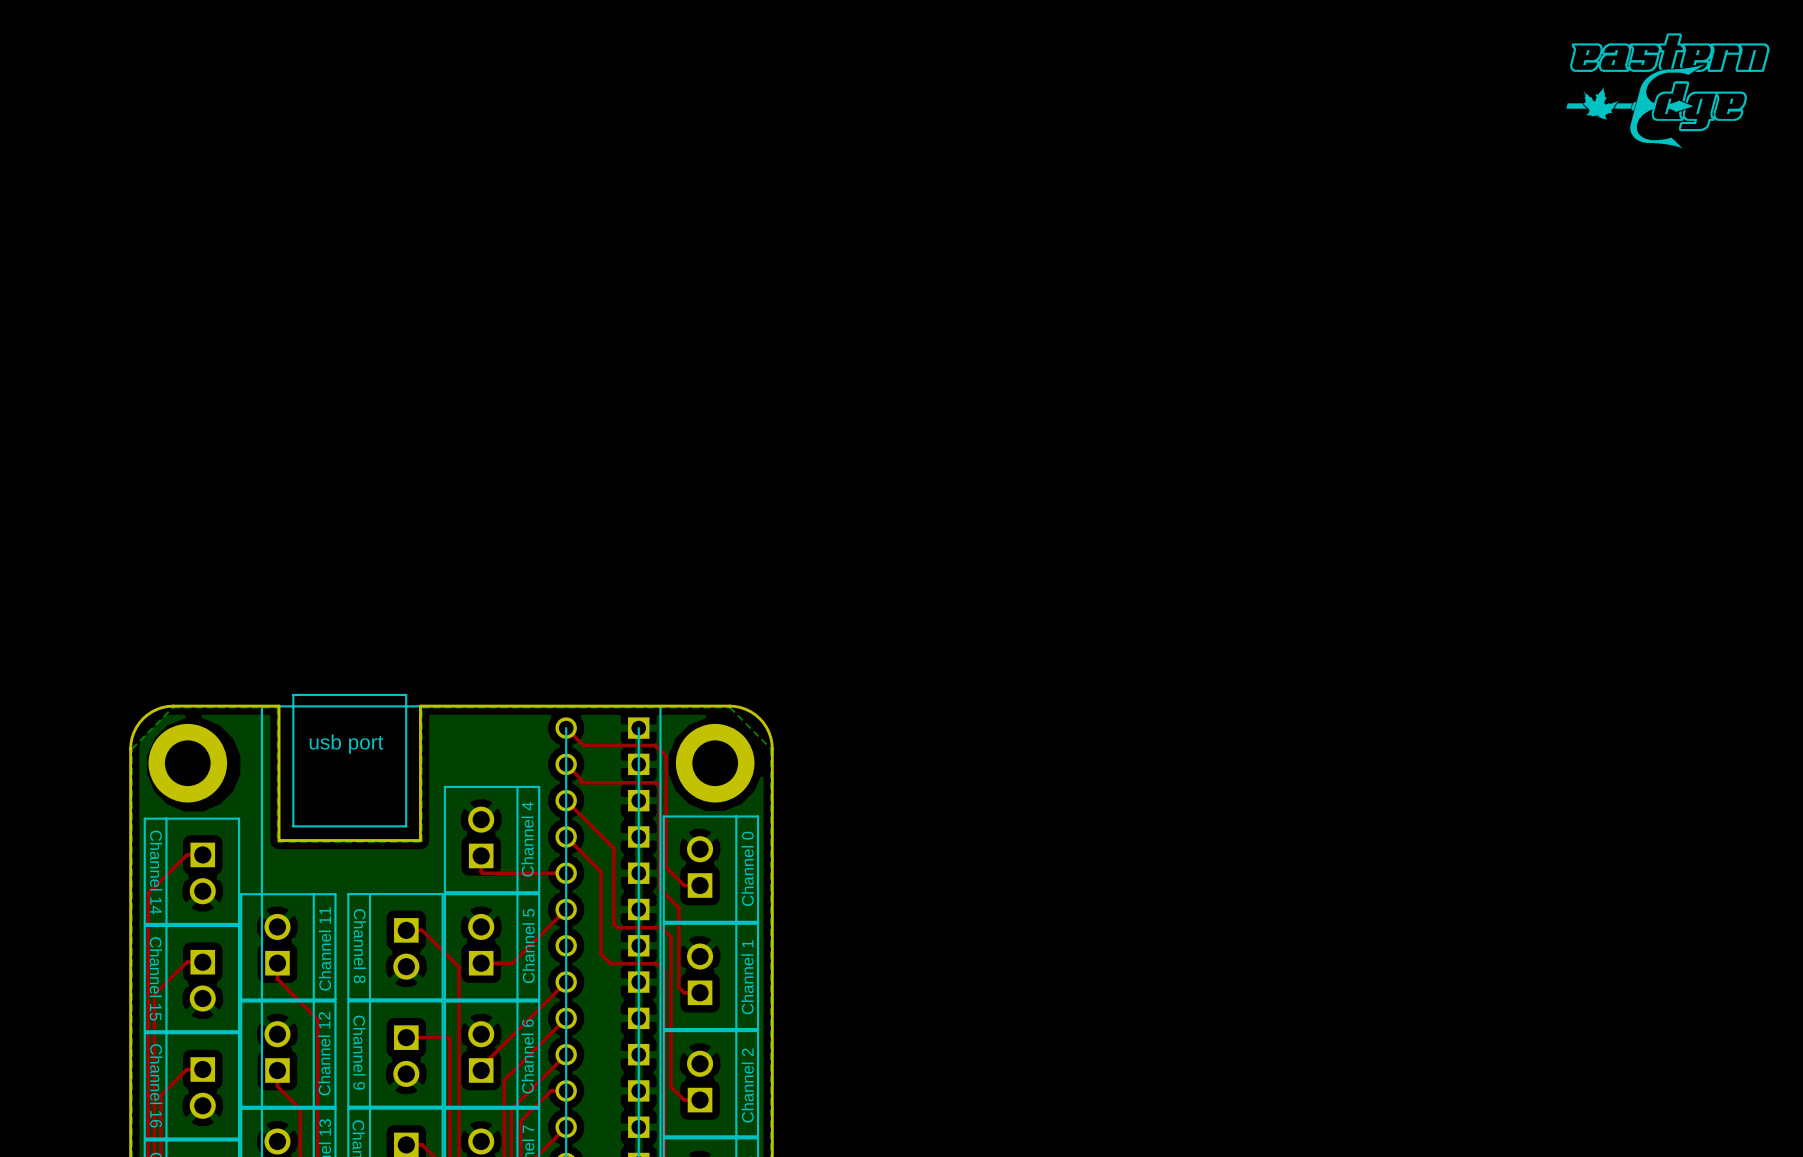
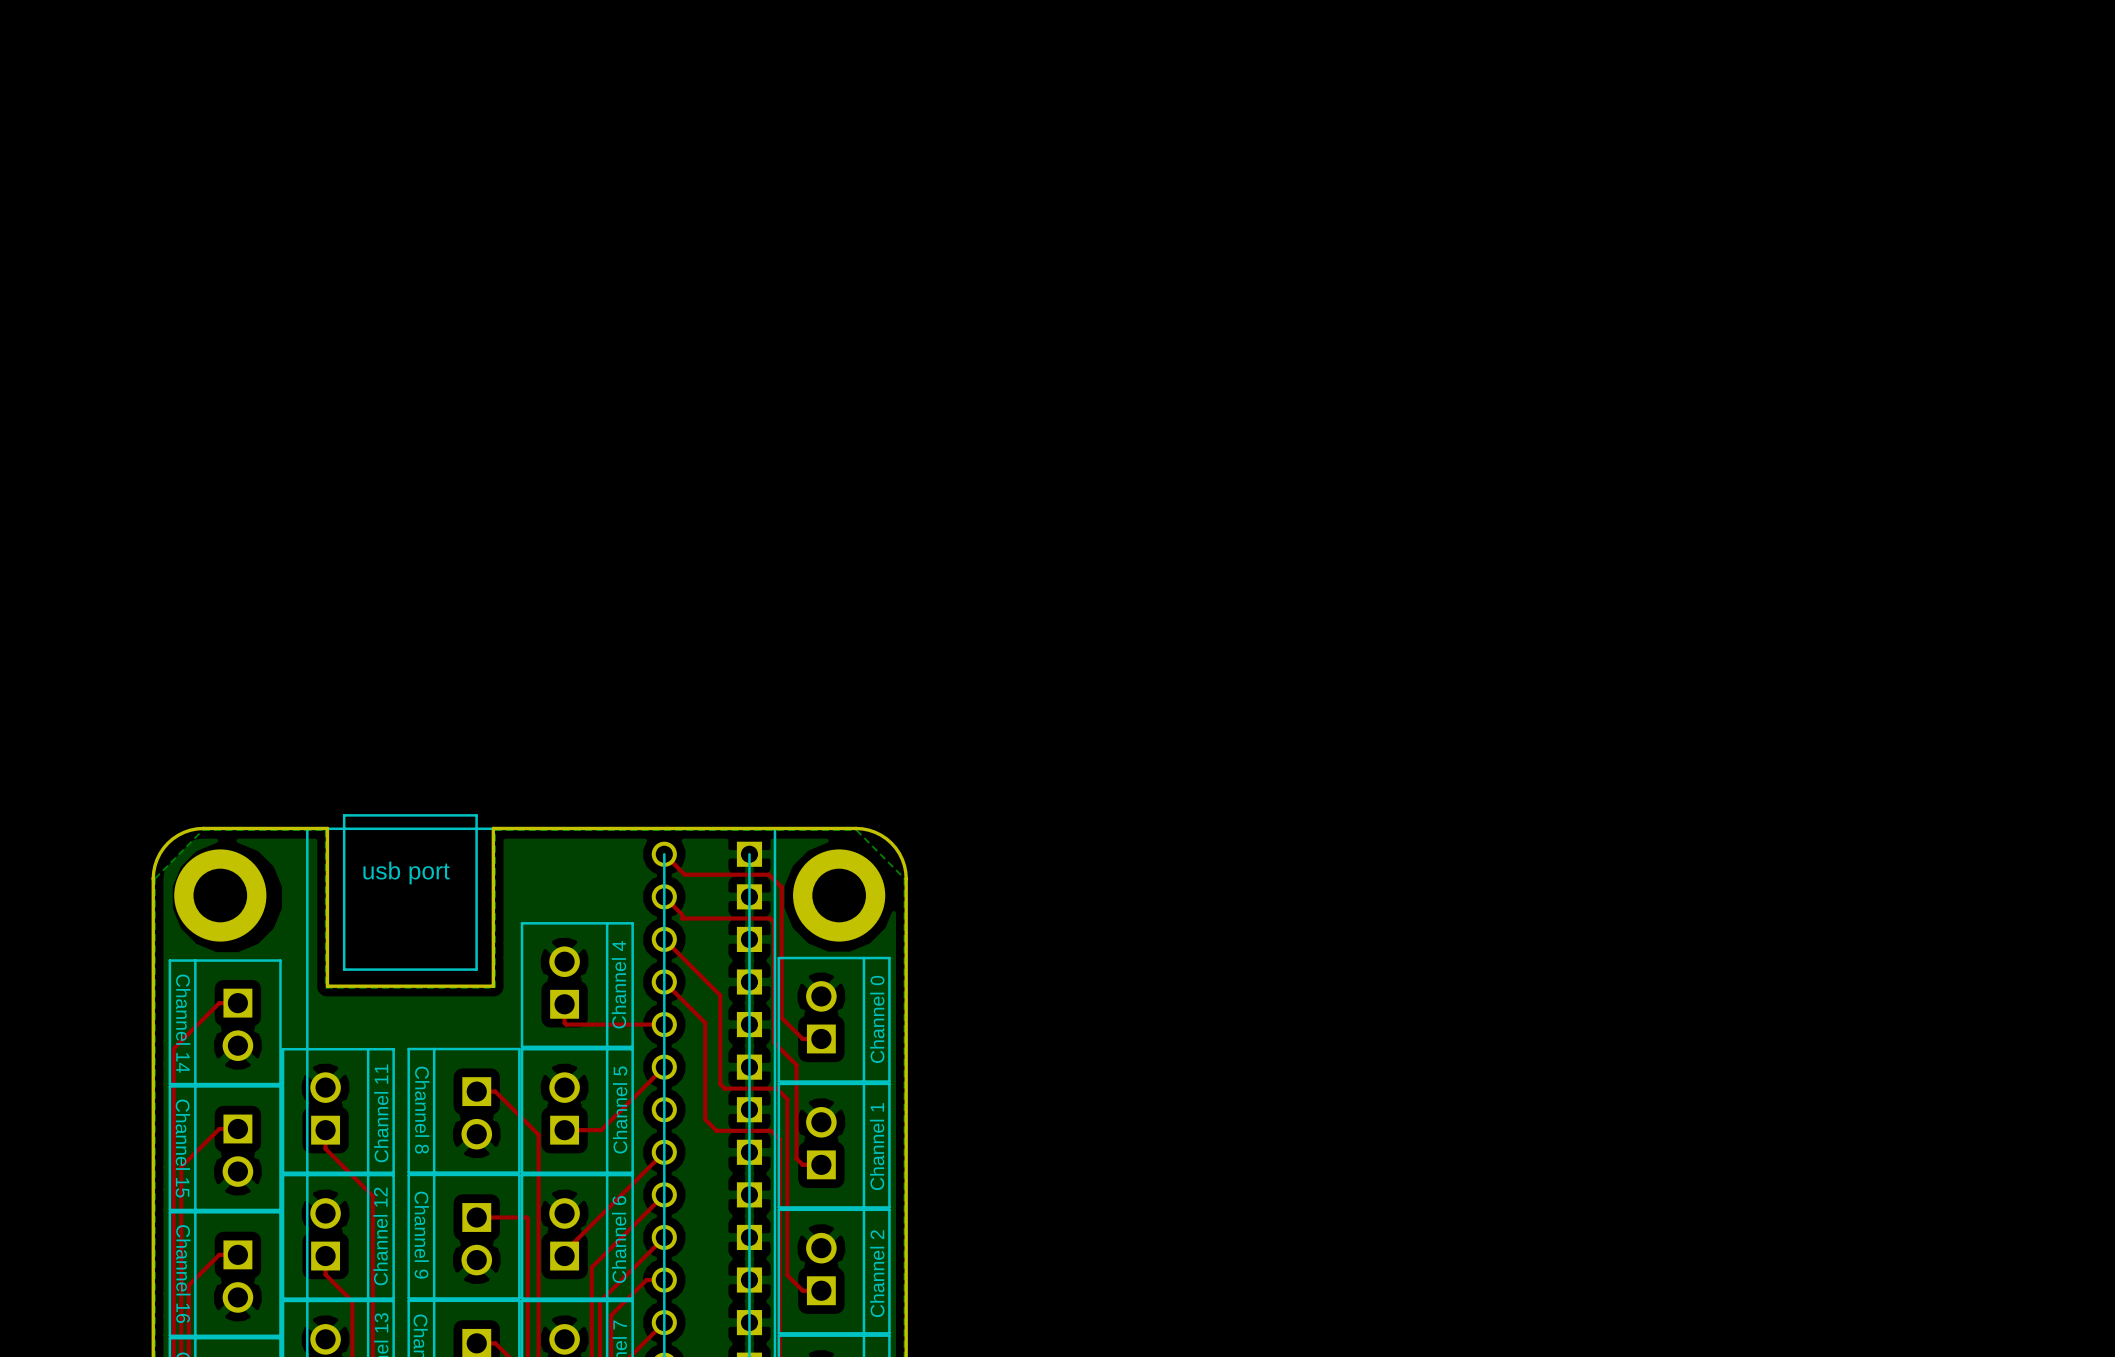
drawing: [1566, 33, 1770, 149] -> none

